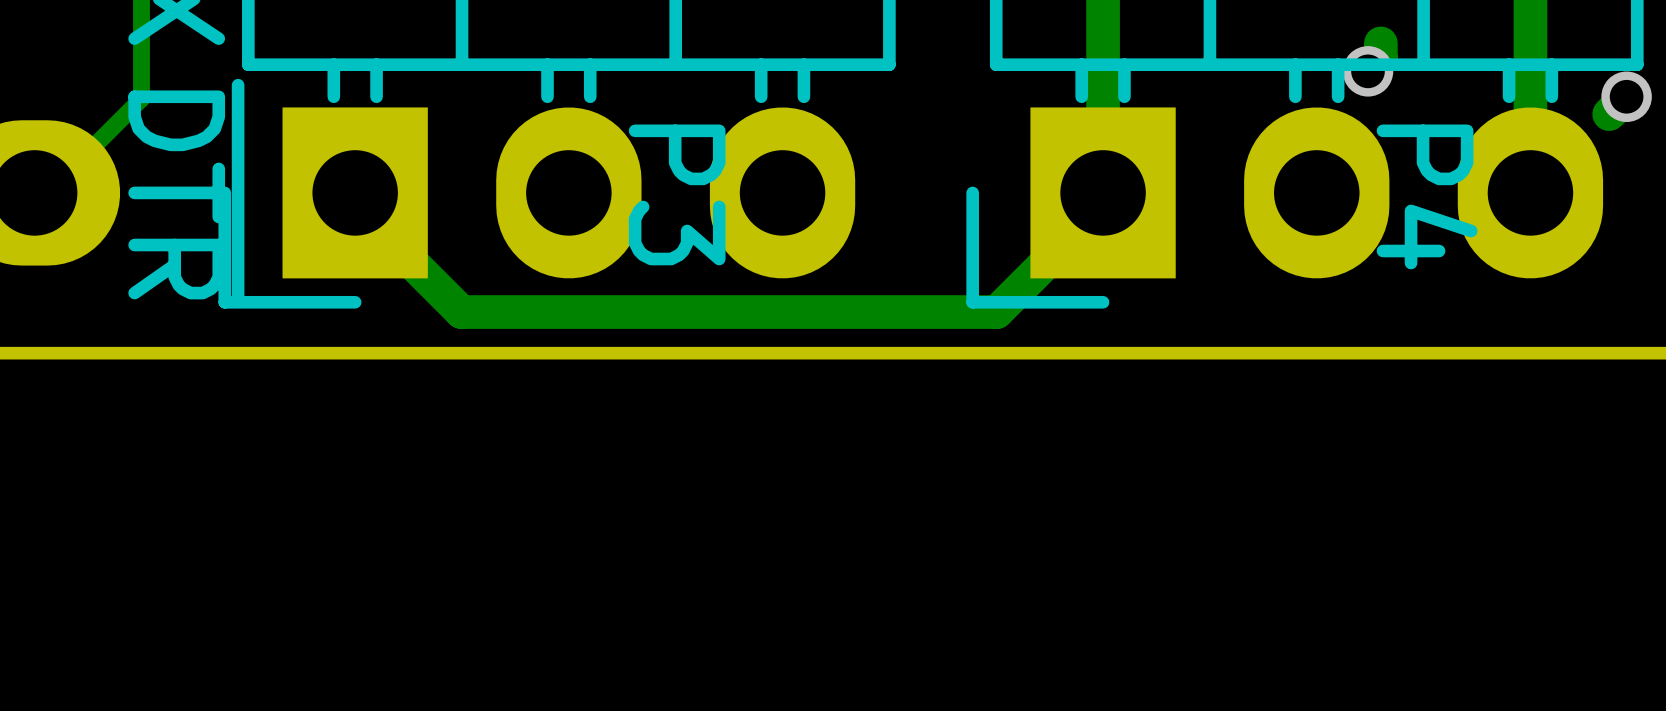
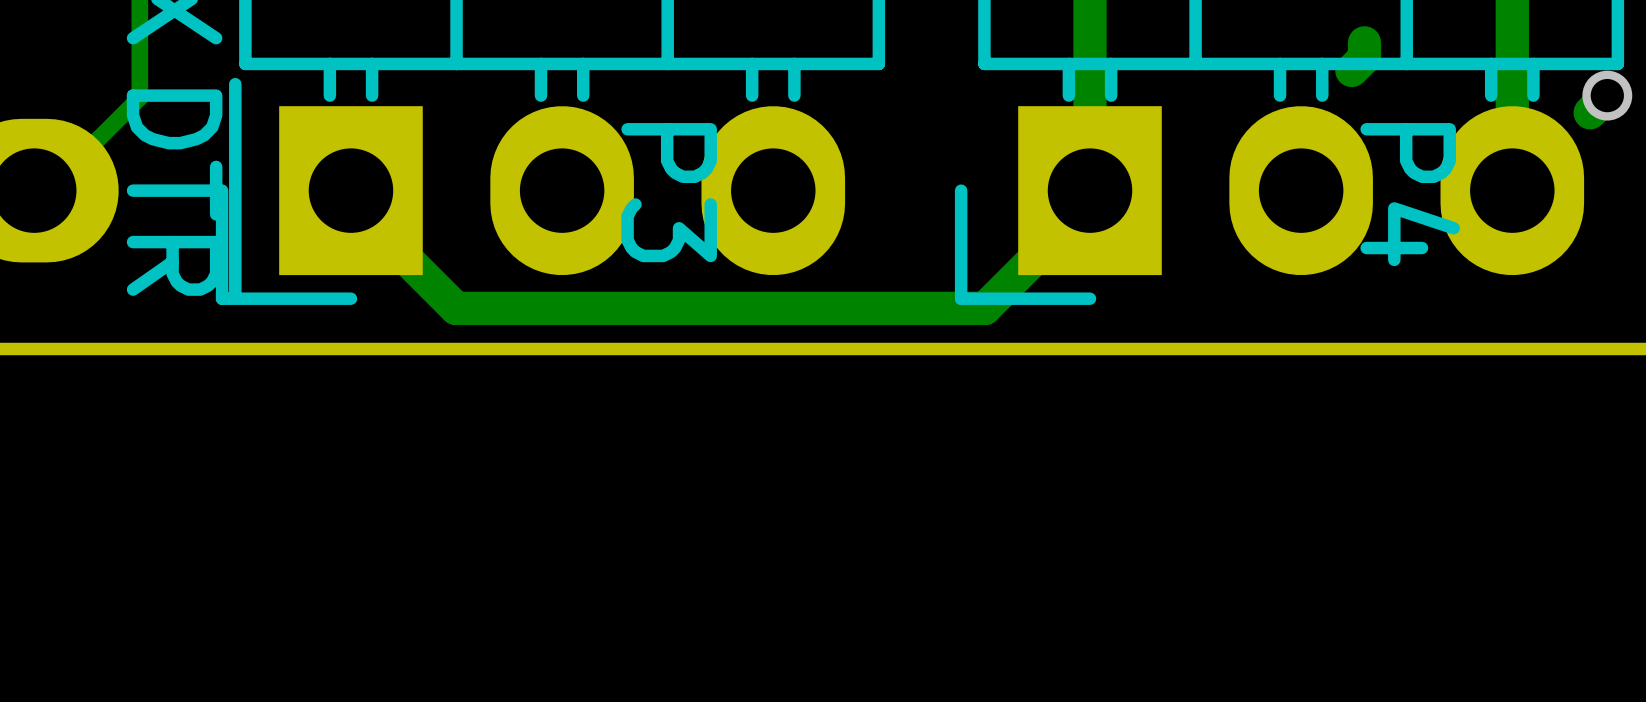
via: (1368, 71) -> none

